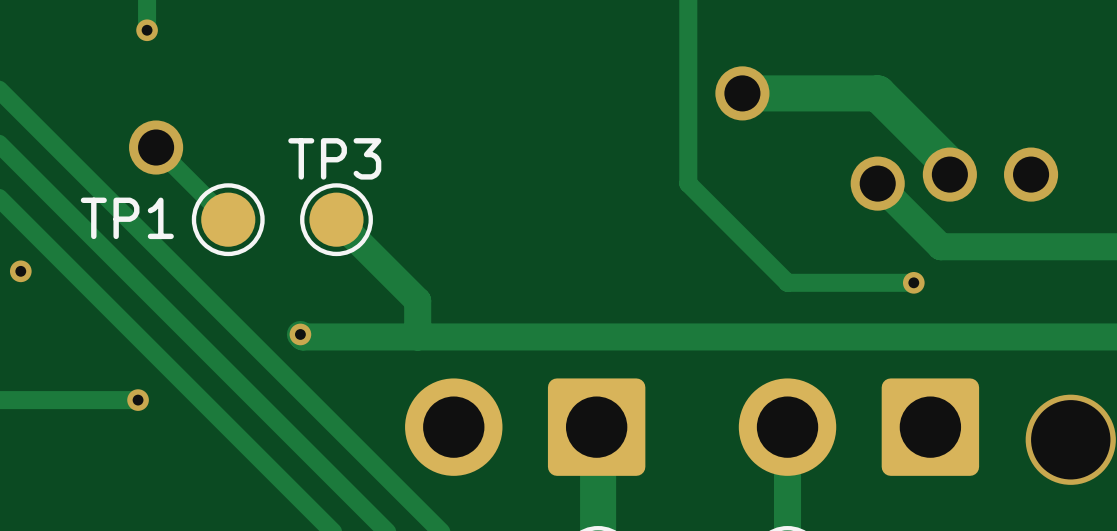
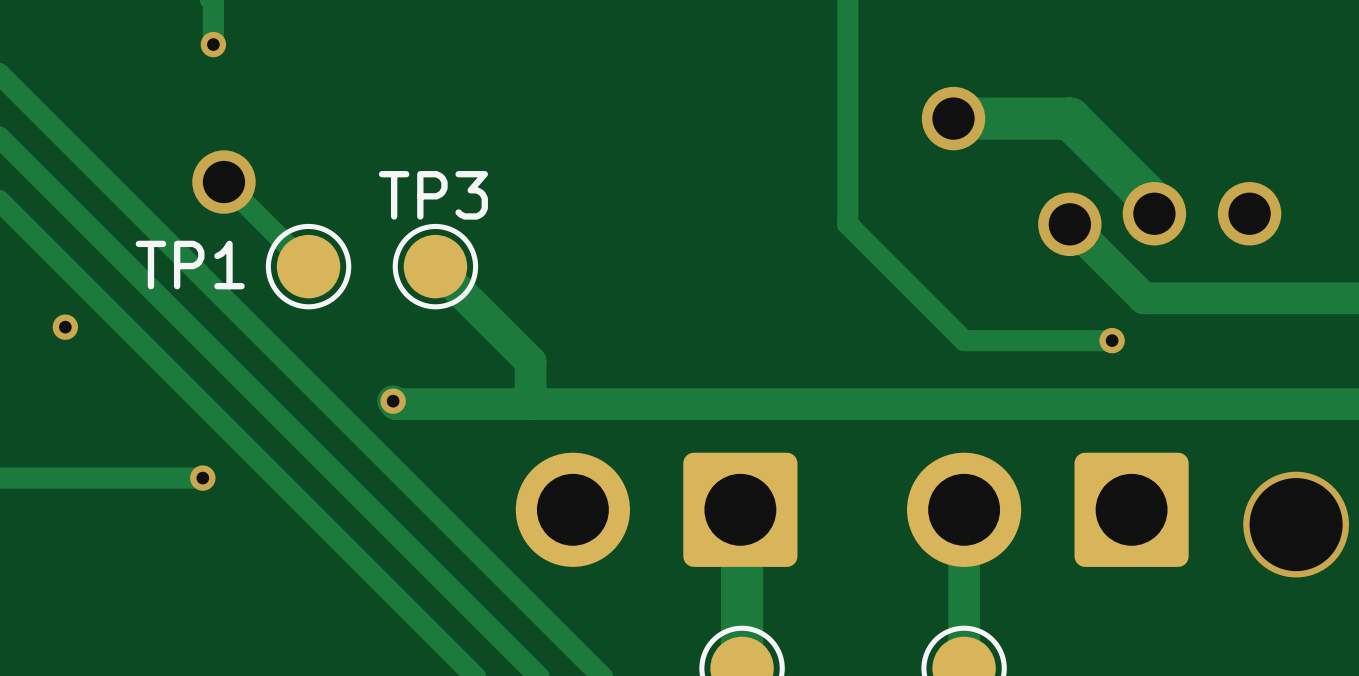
via position: (742, 93) -> (953, 118)

